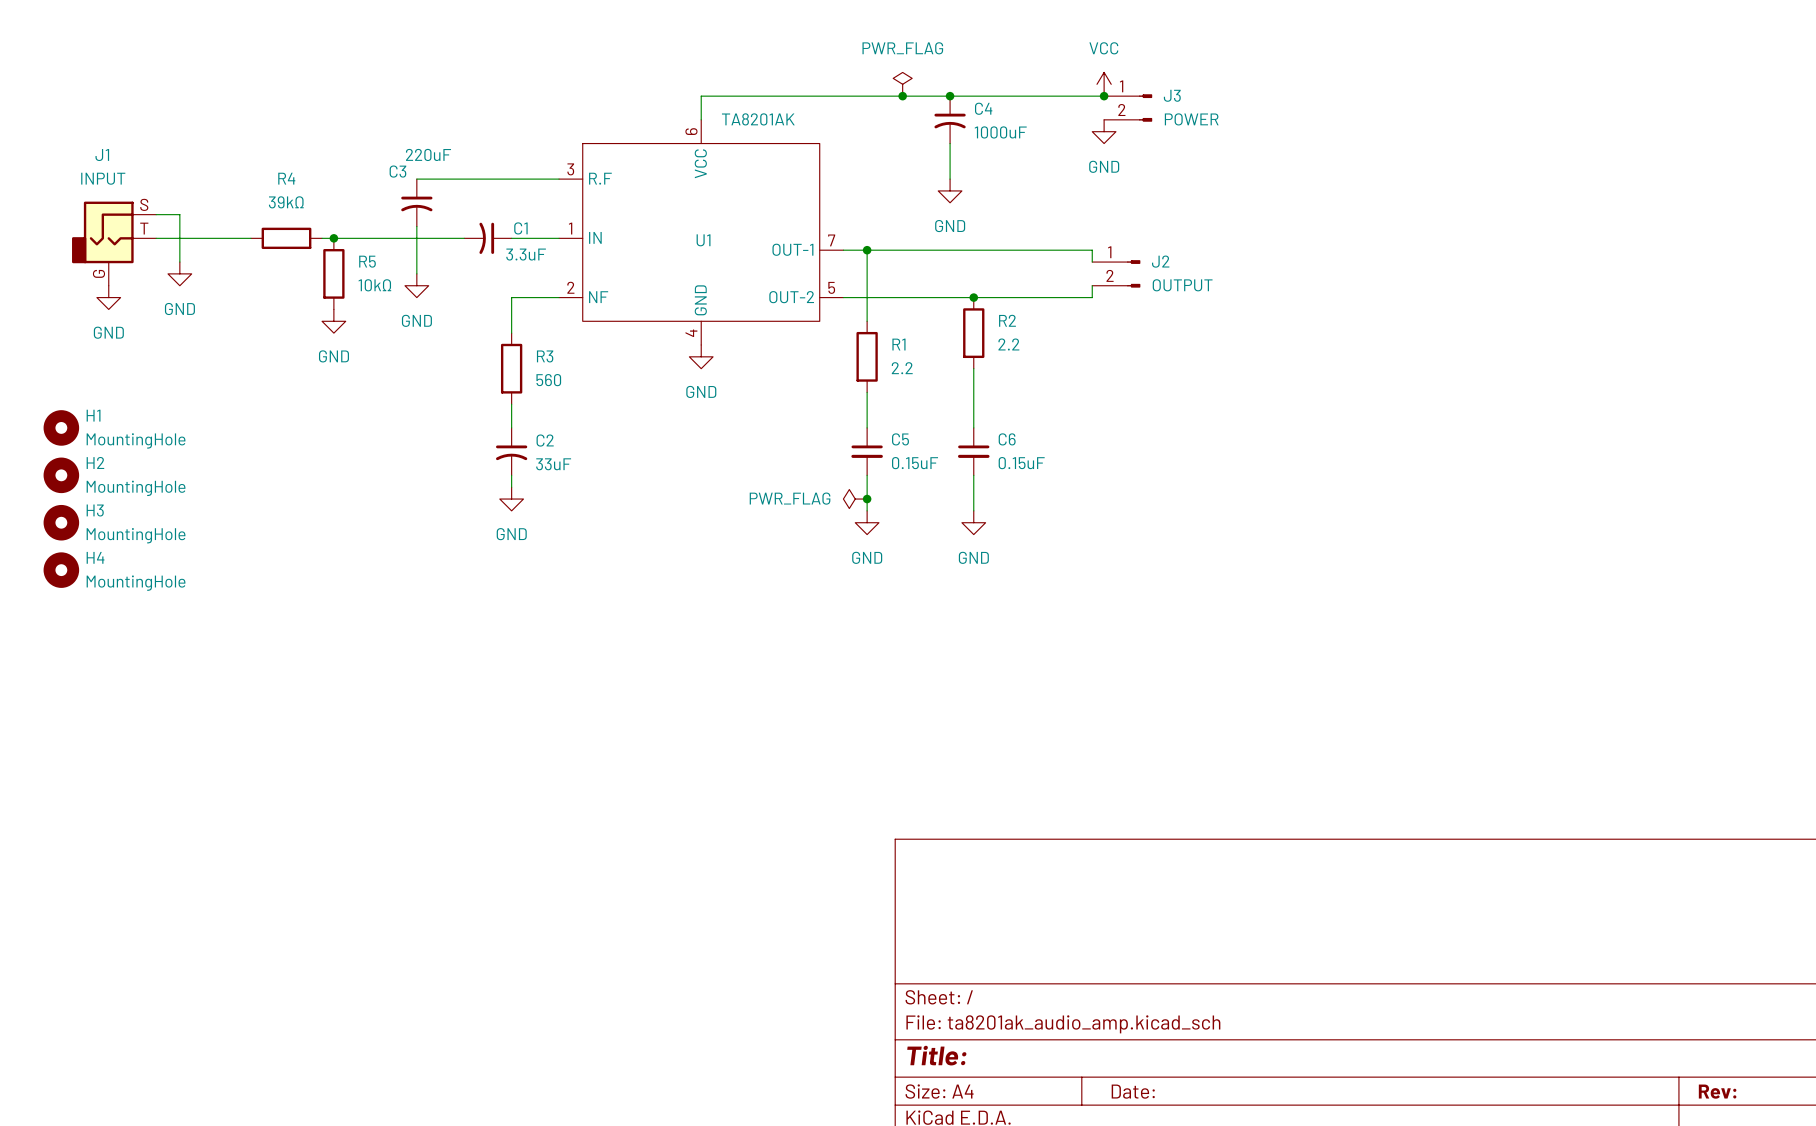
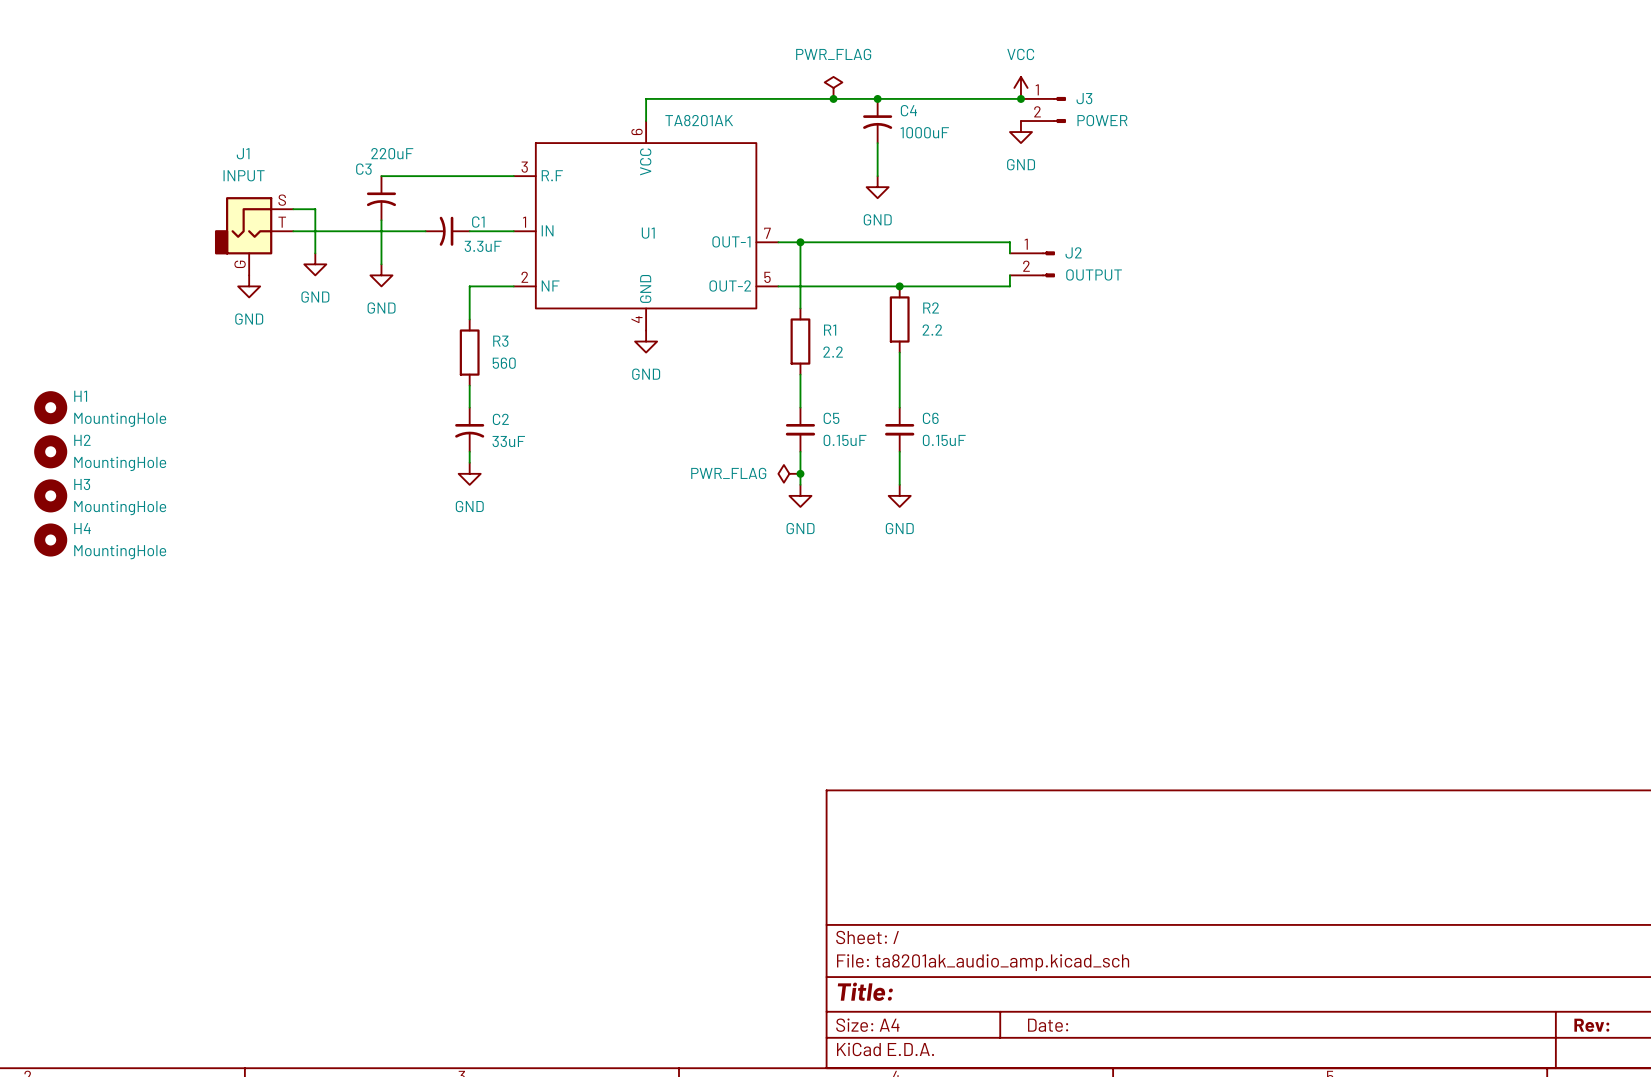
wire: (156, 214) (179, 214) (179, 262) -> (293, 209) (315, 209) (315, 253)
wire: (156, 238) (250, 238) -> none
R4: 39kΩ (286, 238) -> none
junction: (333, 238) -> none
J1 position: (114, 243) -> (254, 236)
power symbol: GND (179, 273) -> none
R5: 10kΩ (333, 273) -> none
power symbol: none -> GND (315, 264)
power symbol: GND (108, 297) -> none
power symbol: none -> GND (249, 286)
power symbol: GND (333, 321) -> none

